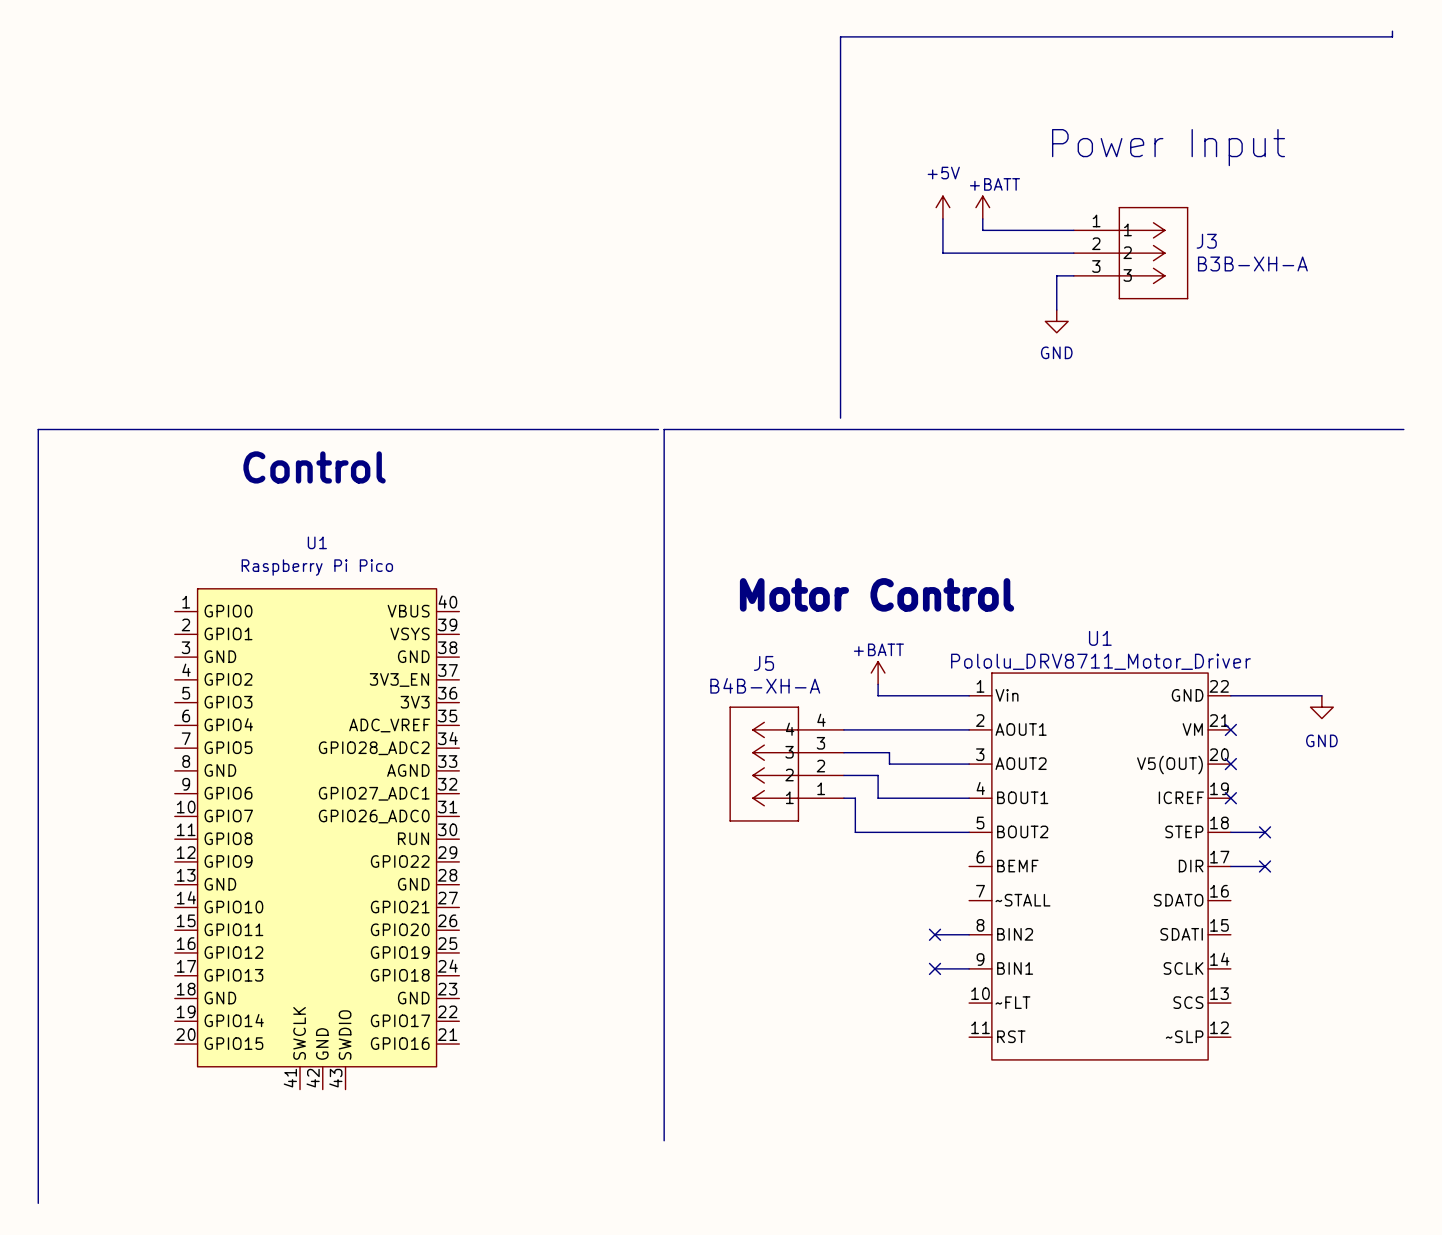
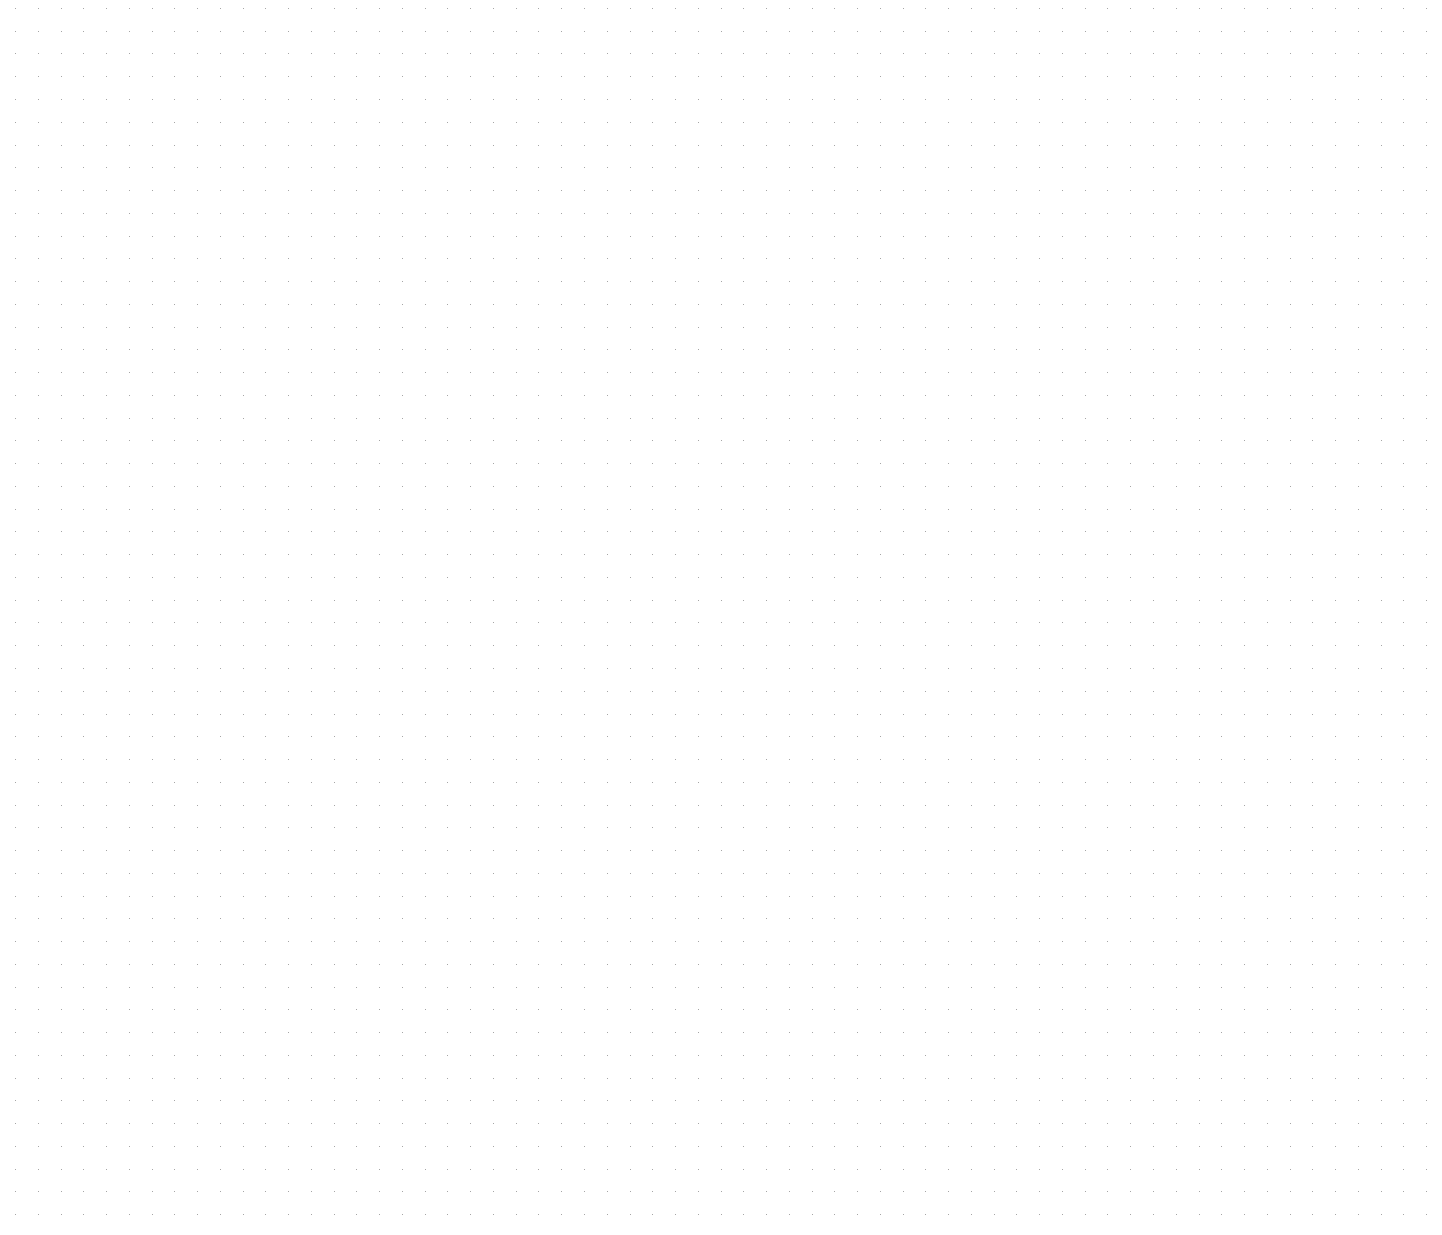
bus: (1392, 31) (1392, 36) (840, 36) (840, 418) -> none
text: Power Input (1168, 147) -> none
power symbol: +5V (942, 207) -> none
power symbol: +BATT (982, 207) -> none
wire: (942, 218) (942, 253) (1073, 253) -> none
wire: (982, 218) (982, 230) (1073, 230) -> none
J3: B3B-XH-A (1131, 253) -> none
wire: (1073, 275) (1056, 275) (1056, 310) -> none
power symbol: GND (1056, 321) -> none
bus: (658, 429) (38, 429) (38, 1203) -> none
bus: (1403, 429) (664, 429) (664, 1140) -> none
text: Control (314, 467) -> none
text: Motor Control (877, 594) -> none
power symbol: +BATT (878, 673) -> none
wire: (878, 684) (878, 695) (969, 695) -> none
wire: (1230, 695) (1321, 695) -> none
power symbol: GND (1321, 707) -> none
wire: (843, 729) (969, 729) -> none
no-connect mark: (1230, 729) -> none
wire: (843, 752) (889, 752) (889, 764) (969, 764) -> none
J5: B4B-XH-A (786, 764) -> none
no-connect mark: (1230, 764) -> none
wire: (843, 775) (878, 775) (878, 798) (969, 798) -> none
wire: (843, 798) (855, 798) (855, 832) (969, 832) -> none
no-connect mark: (1230, 798) -> none
wire: (1230, 832) (1265, 832) -> none
no-connect mark: (1265, 832) -> none
U1: Raspberry Pi Pico (317, 839) -> none
U1: Pololu_DRV8711_Motor_Driver (1100, 866) -> none
wire: (1230, 866) (1265, 866) -> none
no-connect mark: (1265, 866) -> none
wire: (934, 934) (969, 934) -> none
no-connect mark: (934, 934) -> none
wire: (934, 968) (969, 968) -> none
no-connect mark: (934, 968) -> none

